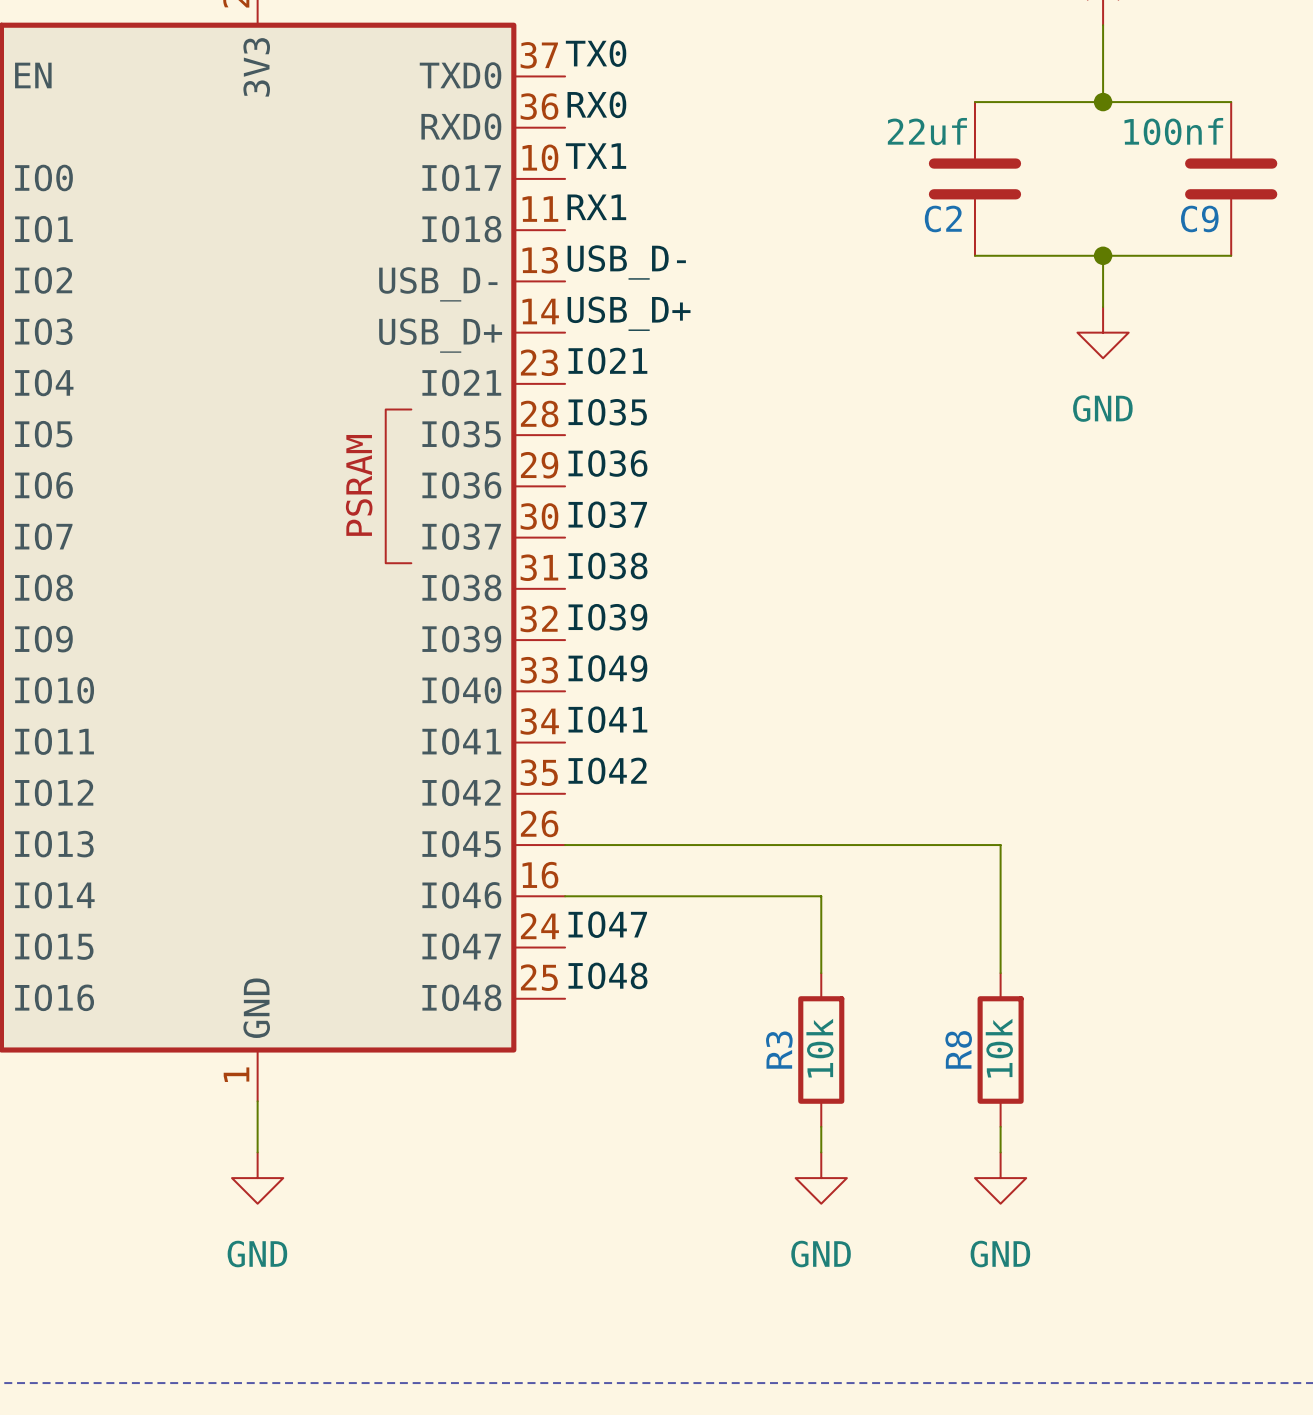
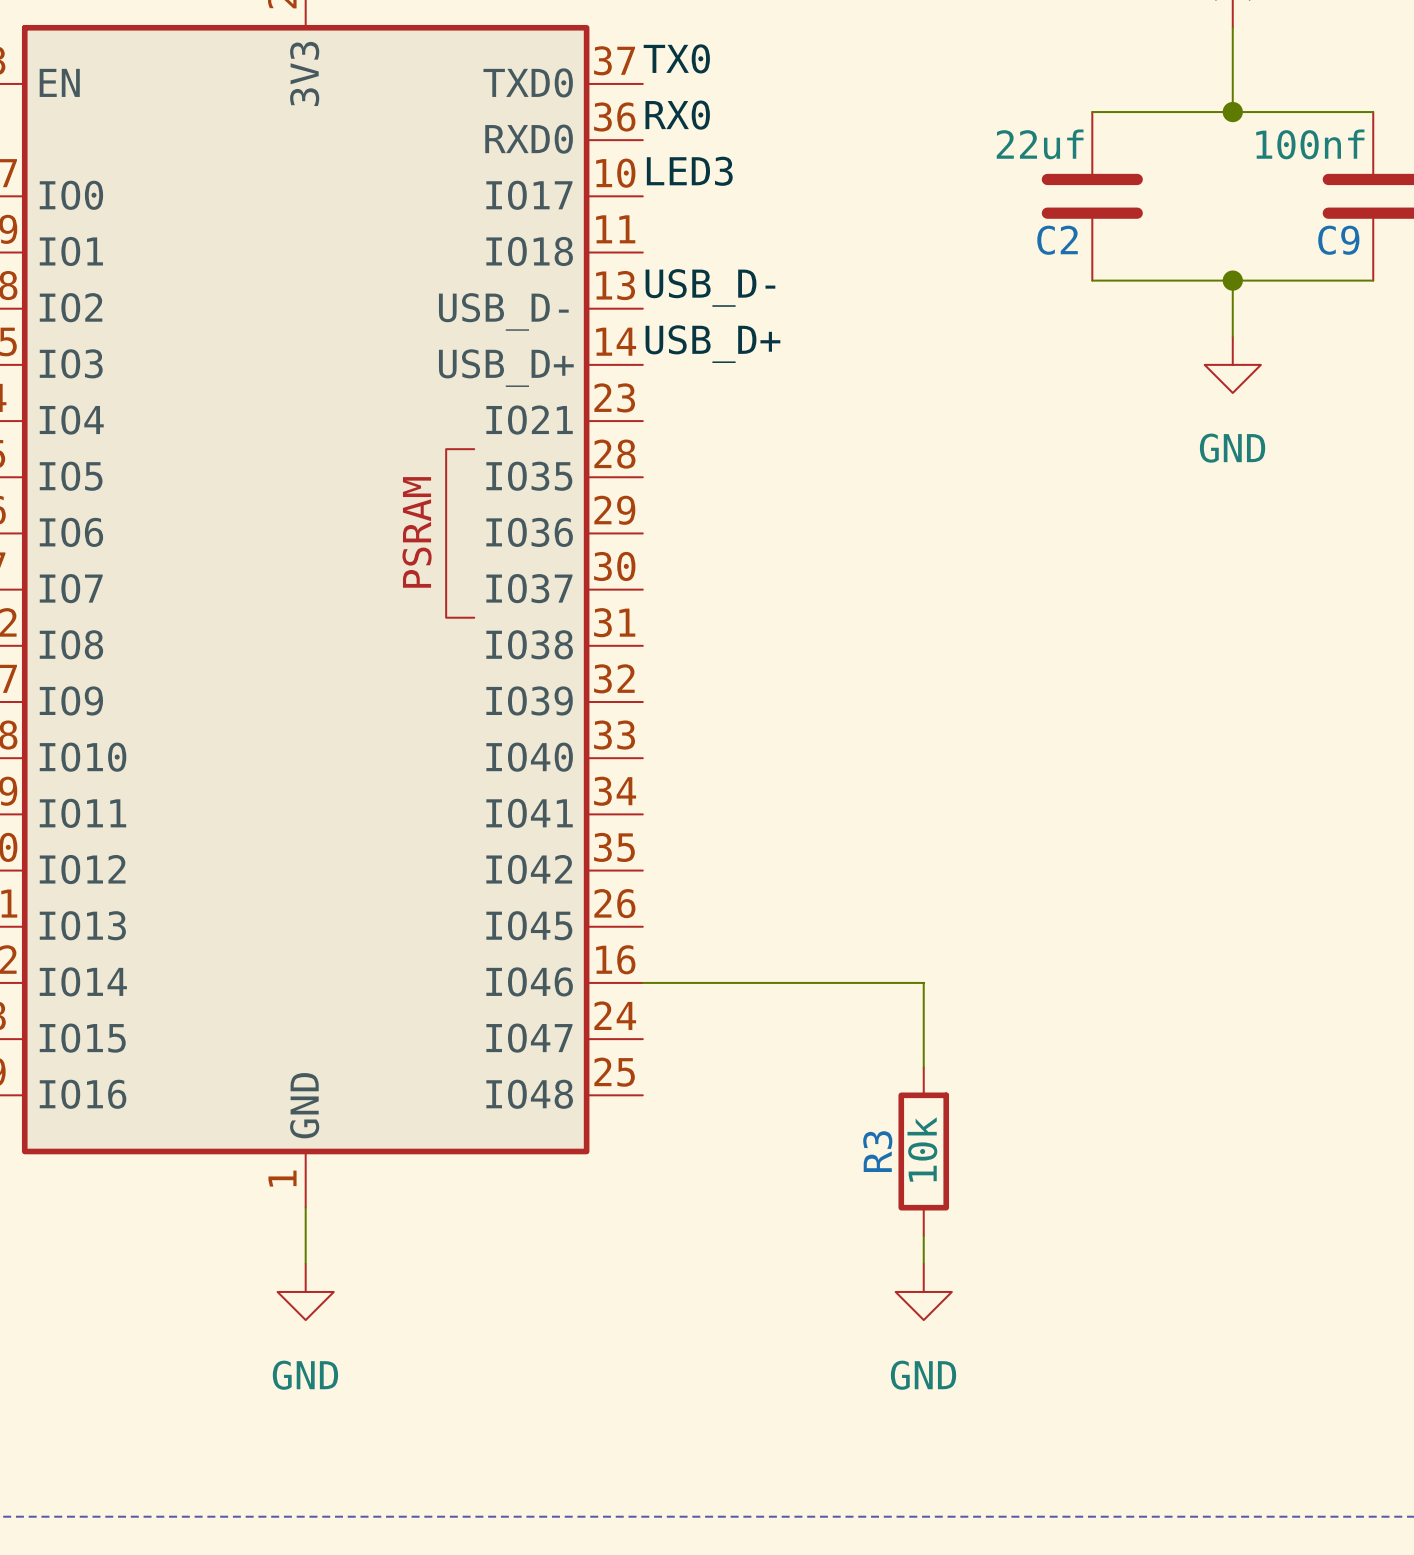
label: TX1 (596, 156) -> LED3 (689, 171)
label: RX1 (596, 207) -> none
label: IO21 (607, 361) -> none
label: IO35 (607, 412) -> none
label: IO36 (607, 463) -> none
label: IO37 (607, 514) -> none
label: IO38 (607, 566) -> none
label: IO39 (607, 617) -> none
label: IO49 (607, 668) -> none
label: IO41 (607, 719) -> none
label: IO42 (607, 770) -> none
wire: (565, 845) (1000, 845) (1000, 973) -> none
label: IO47 (607, 924) -> none
label: IO48 (607, 975) -> none
R8: 10k (1000, 1050) -> none
wire: (1000, 1126) (1000, 1152) -> none
power symbol: GND (1000, 1178) -> none

